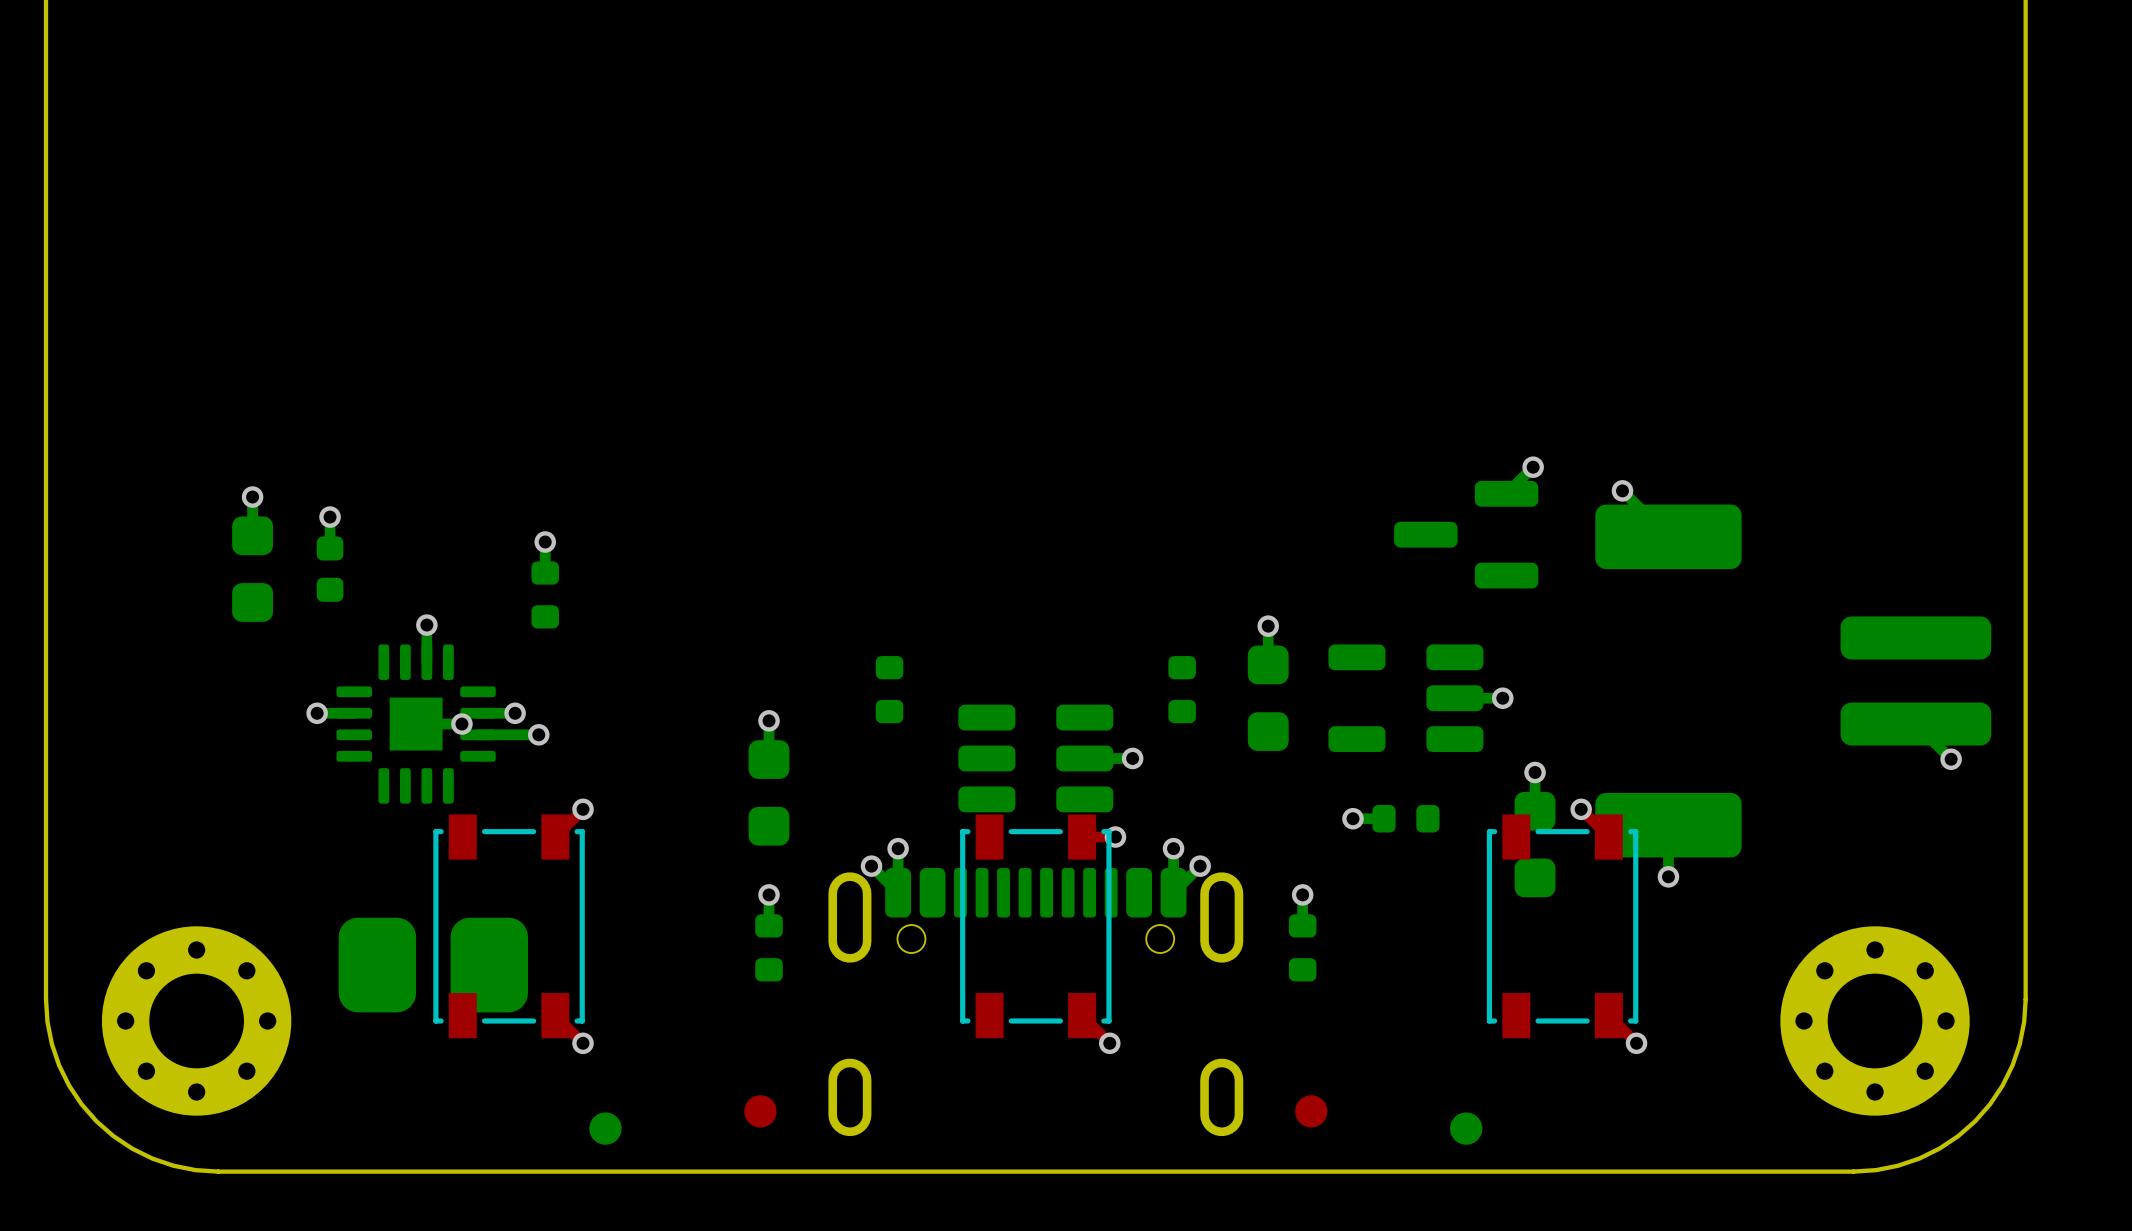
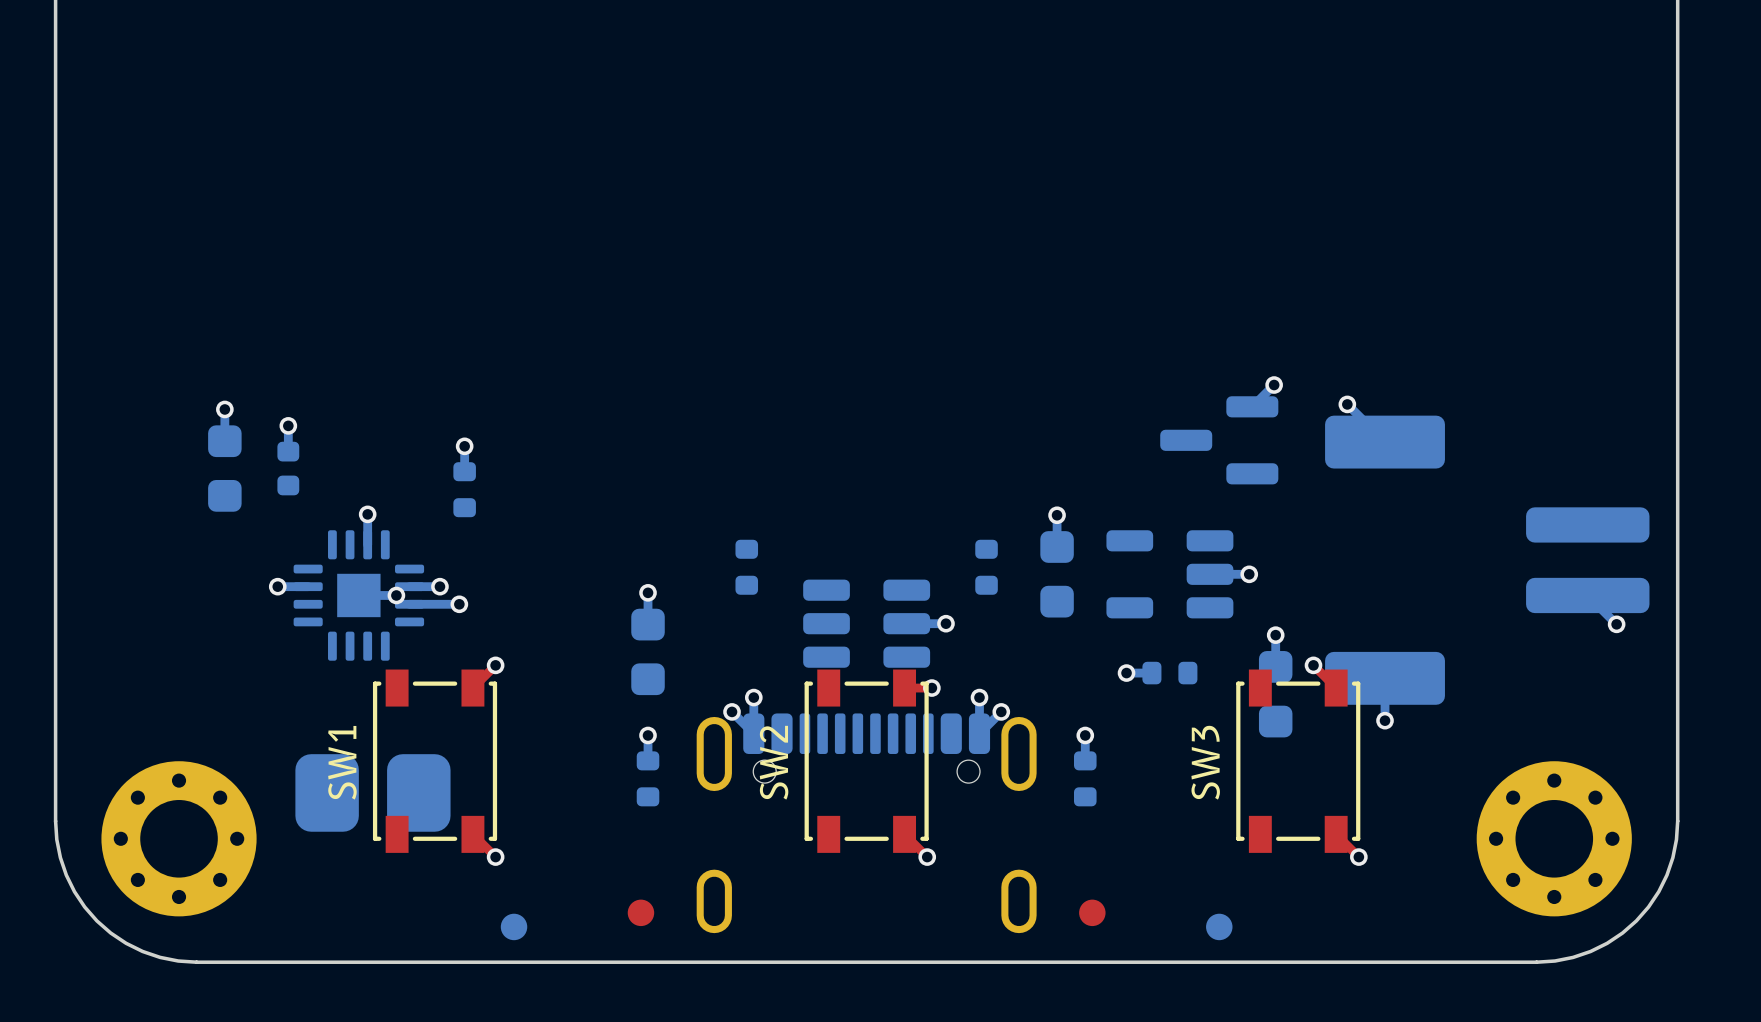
SW1 name: none -> SW1 (342, 762)
SW2 name: none -> SW2 (774, 762)
SW3 name: none -> SW3 (1205, 762)

